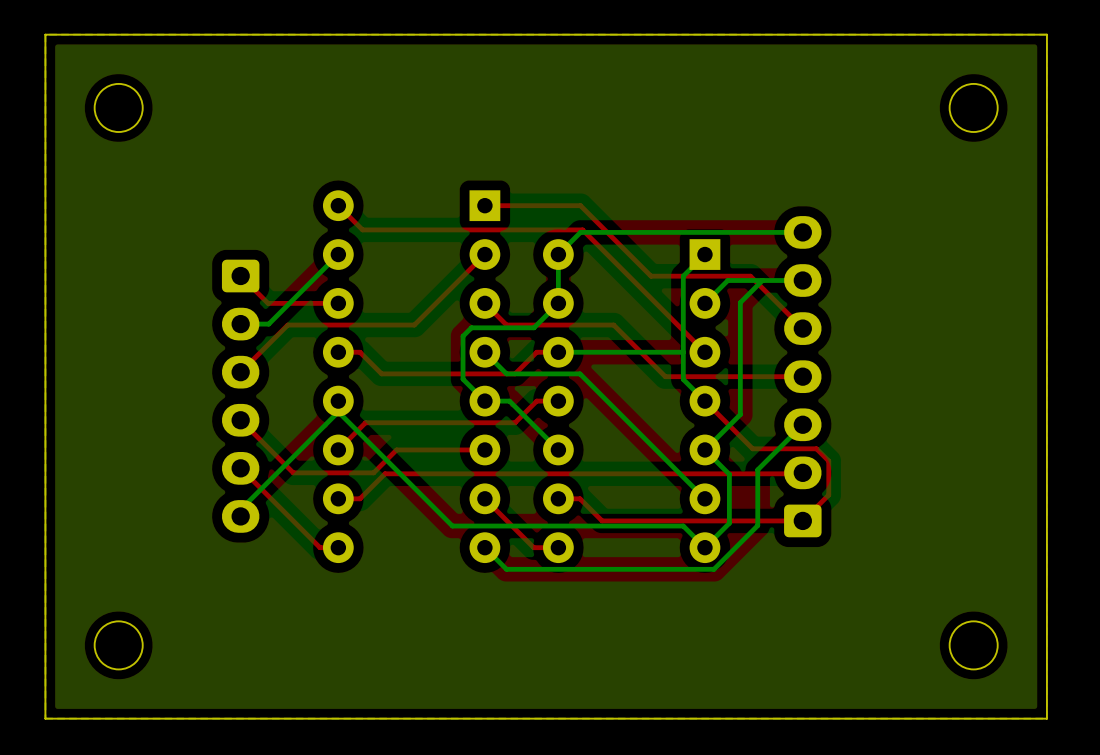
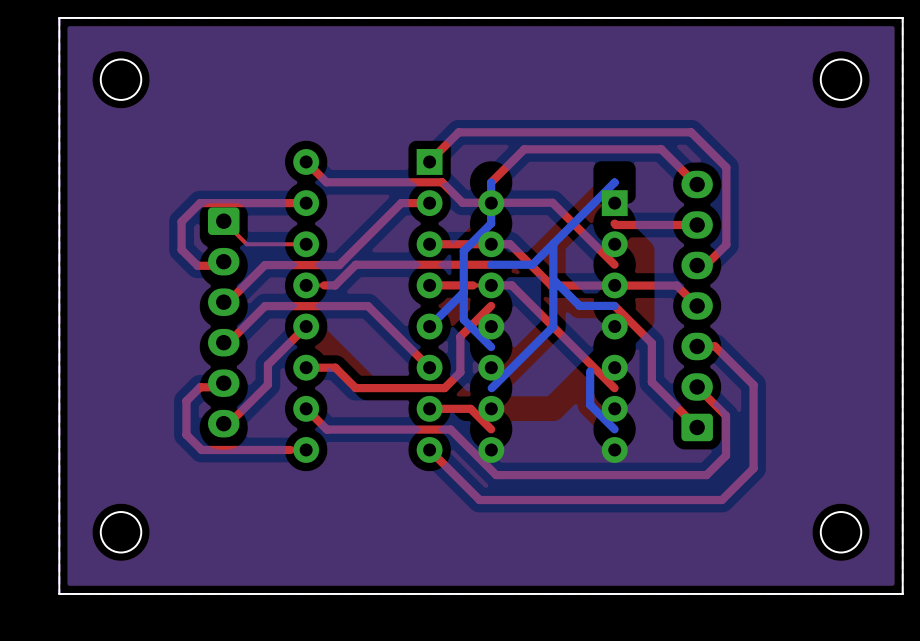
top track: (338, 205) (362, 229) (582, 229) (704, 352) -> (306, 161) (326, 182) (442, 182) (462, 202) (552, 202) (614, 264)
top track: (484, 205) (580, 205) (651, 276) (750, 276) (802, 328) -> (429, 161) (458, 132) (691, 132) (726, 167) (726, 244) (705, 265) (697, 265)
top track: none -> (491, 182) (524, 149) (661, 149) (697, 184)
bottom track: none -> (491, 182) (491, 223) (463, 250) (463, 319) (491, 347)
bottom track: none -> (614, 182) (532, 264) (491, 264)
bottom track: (802, 232) (580, 232) (558, 254) (558, 303) (533, 327) (471, 327) (463, 336) (463, 379) (484, 401) (509, 401) (558, 449) -> none
top track: none -> (306, 203) (200, 203) (181, 221) (181, 249) (197, 265) (223, 265)
bottom track: (338, 254) (268, 324) (240, 324) -> none
top track: (484, 254) (414, 325) (287, 325) (240, 372) -> (429, 203) (401, 203) (339, 265) (264, 265) (223, 306)
bottom track: (704, 254) (683, 276) (683, 379) (704, 401) -> none
top track: none -> (614, 223) (697, 224)
bottom track: (762, 280) (740, 302) (740, 414) (704, 449) (729, 474) (729, 523) (704, 547) (683, 526) (452, 526) (338, 411) (240, 509) (240, 516) -> none
bottom track: (802, 280) (727, 280) (704, 303) -> none
bottom track: none -> (553, 243) (553, 326) (491, 388)
top track: (484, 303) (506, 325) (613, 325) (665, 376) (802, 376) -> (429, 244) (510, 244) (551, 285) (676, 285) (697, 305)
bottom track: none -> (553, 279) (579, 305) (614, 305)
bottom track: (484, 352) (506, 373) (580, 373) (704, 498) -> none
top track: (536, 352) (515, 373) (381, 373) (359, 352) -> (491, 264) (355, 264) (335, 285) (324, 285)
top track: none -> (473, 285) (429, 285)
top track: none -> (491, 285) (511, 285) (614, 388)
bottom track: (683, 352) (558, 352) -> none
bottom track: none -> (463, 292) (429, 326)
top track: none -> (614, 305) (651, 343) (651, 382) (697, 427)
top track: none -> (306, 326) (267, 364) (267, 384) (224, 427)
top track: (558, 401) (536, 401) (515, 422) (365, 422) (338, 449) -> (491, 305) (460, 336) (460, 372) (444, 388) (355, 388) (335, 367) (306, 367)
top track: (704, 401) (752, 448) (816, 448) (828, 461) (828, 494) (802, 520) (602, 520) (580, 498) (558, 498) -> none
top track: (240, 420) (293, 472) (373, 472) (396, 449) (484, 449) -> (224, 346) (265, 306) (368, 306) (429, 367)
top track: none -> (697, 346) (715, 346) (753, 385) (753, 468) (721, 500) (479, 500) (429, 449)
bottom track: (802, 424) (757, 469) (757, 525) (714, 569) (506, 569) (484, 547) -> none
bottom track: none -> (590, 371) (590, 404) (614, 429)
top track: (240, 468) (320, 547) -> (223, 387) (200, 387) (186, 401) (186, 434) (201, 449) (290, 449)
top track: (802, 472) (385, 473) (359, 498) (338, 498) -> (697, 386) (726, 415) (726, 455) (706, 475) (496, 475) (450, 429) (326, 429) (306, 408)
top track: (484, 498) (533, 547) (558, 547) -> (429, 408) (470, 408) (491, 429)

